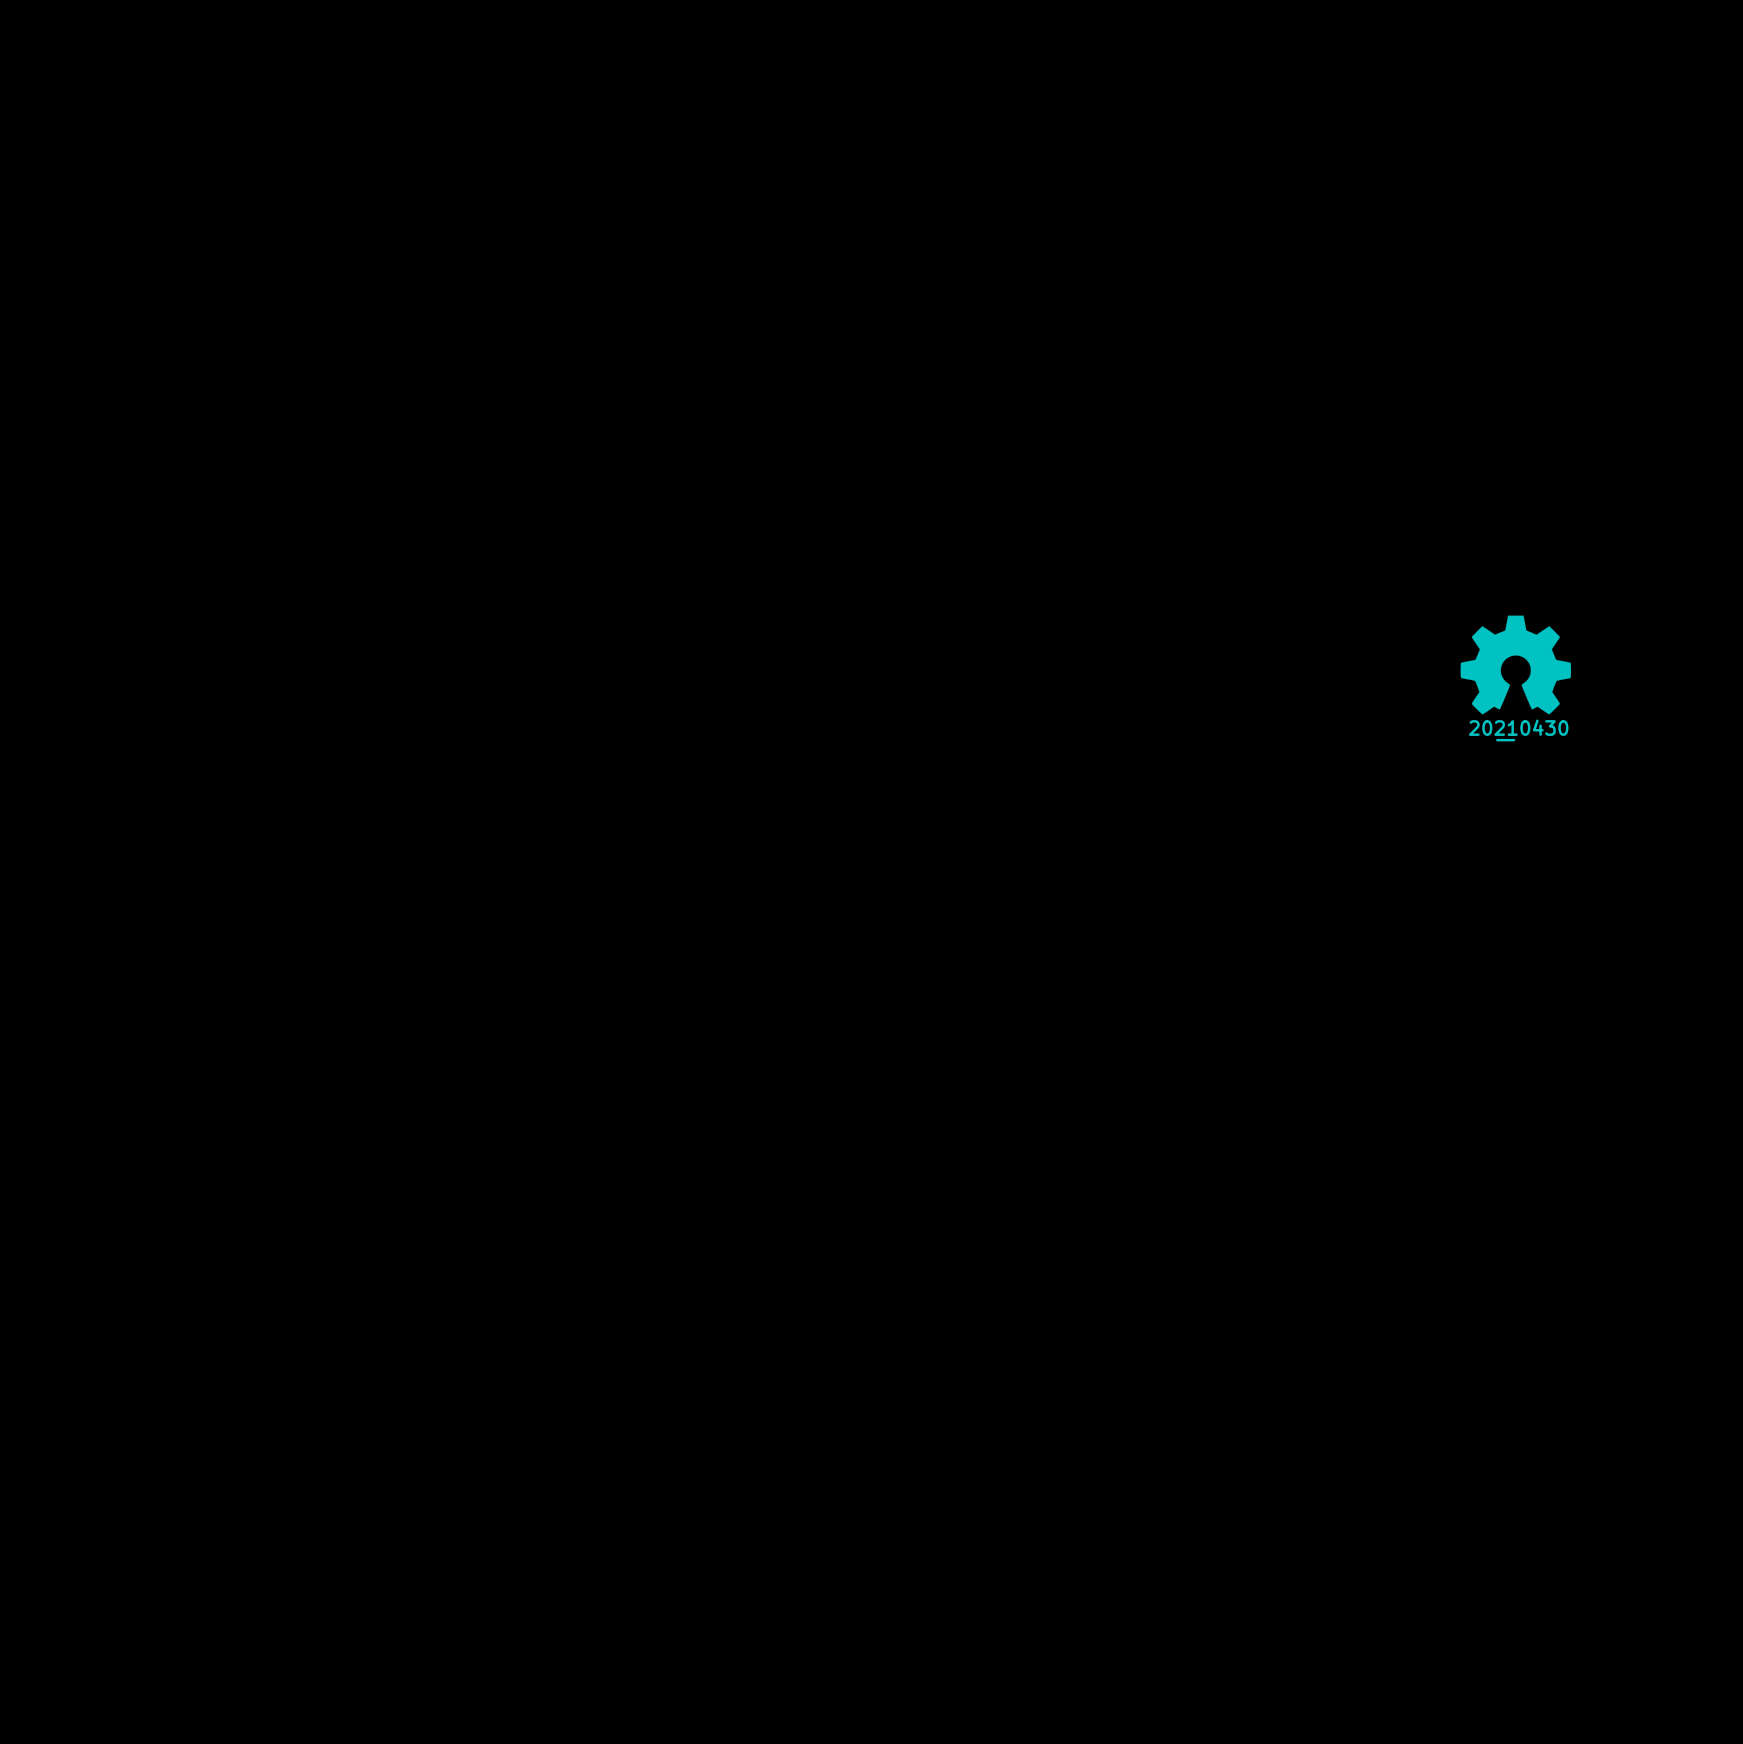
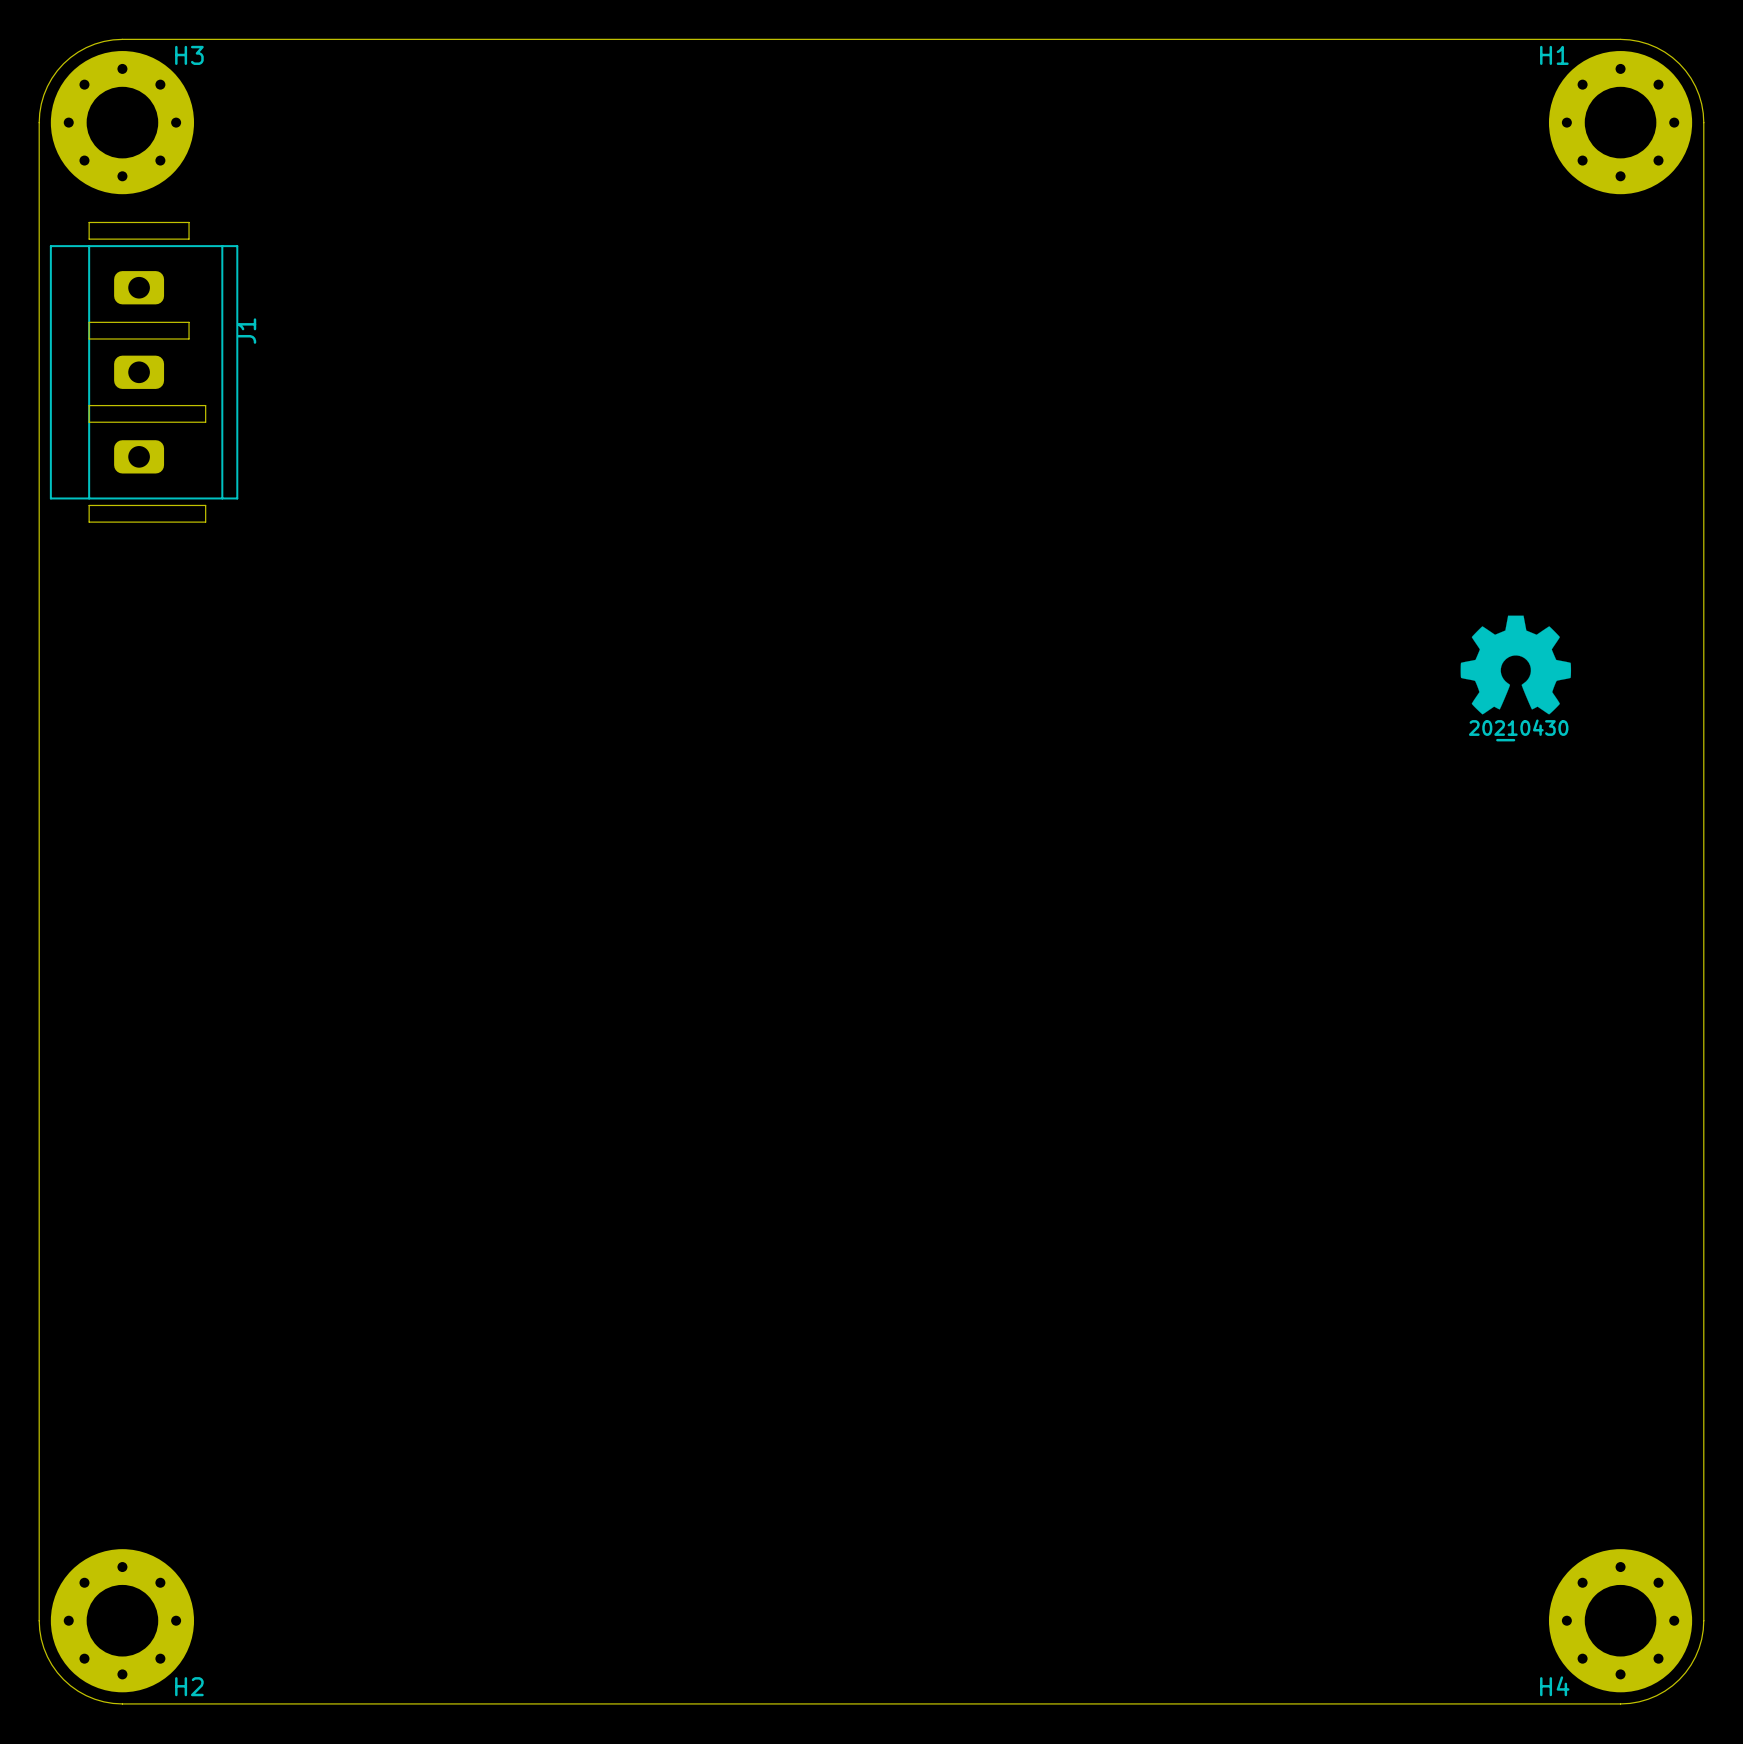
board edge: none -> (122, 39) (1620, 39) (1648, 44) (1664, 52) (1679, 63) (1691, 78) (1699, 95) (1703, 122) (1703, 1620) (1699, 1648) (1691, 1665) (1679, 1679) (1664, 1691) (1648, 1699) (1620, 1703) (122, 1703) (94, 1699) (78, 1691) (63, 1679) (51, 1665) (43, 1648) (39, 1620) (39, 122) (41, 104) (47, 86) (63, 63) (86, 47) (103, 41) (122, 39)
H3: none -> (122, 122)
H1: none -> (1620, 122)
board edge: none -> (89, 222) (89, 239) (189, 239) (189, 222) (89, 222)
board edge: none -> (89, 322) (89, 339) (189, 339) (189, 322) (89, 322)
J1: none -> (144, 372)
board edge: none -> (89, 405) (89, 422) (205, 422) (205, 405) (89, 405)
board edge: none -> (89, 505) (89, 522) (205, 522) (205, 505) (89, 505)
H2: none -> (122, 1620)
H4: none -> (1620, 1620)

